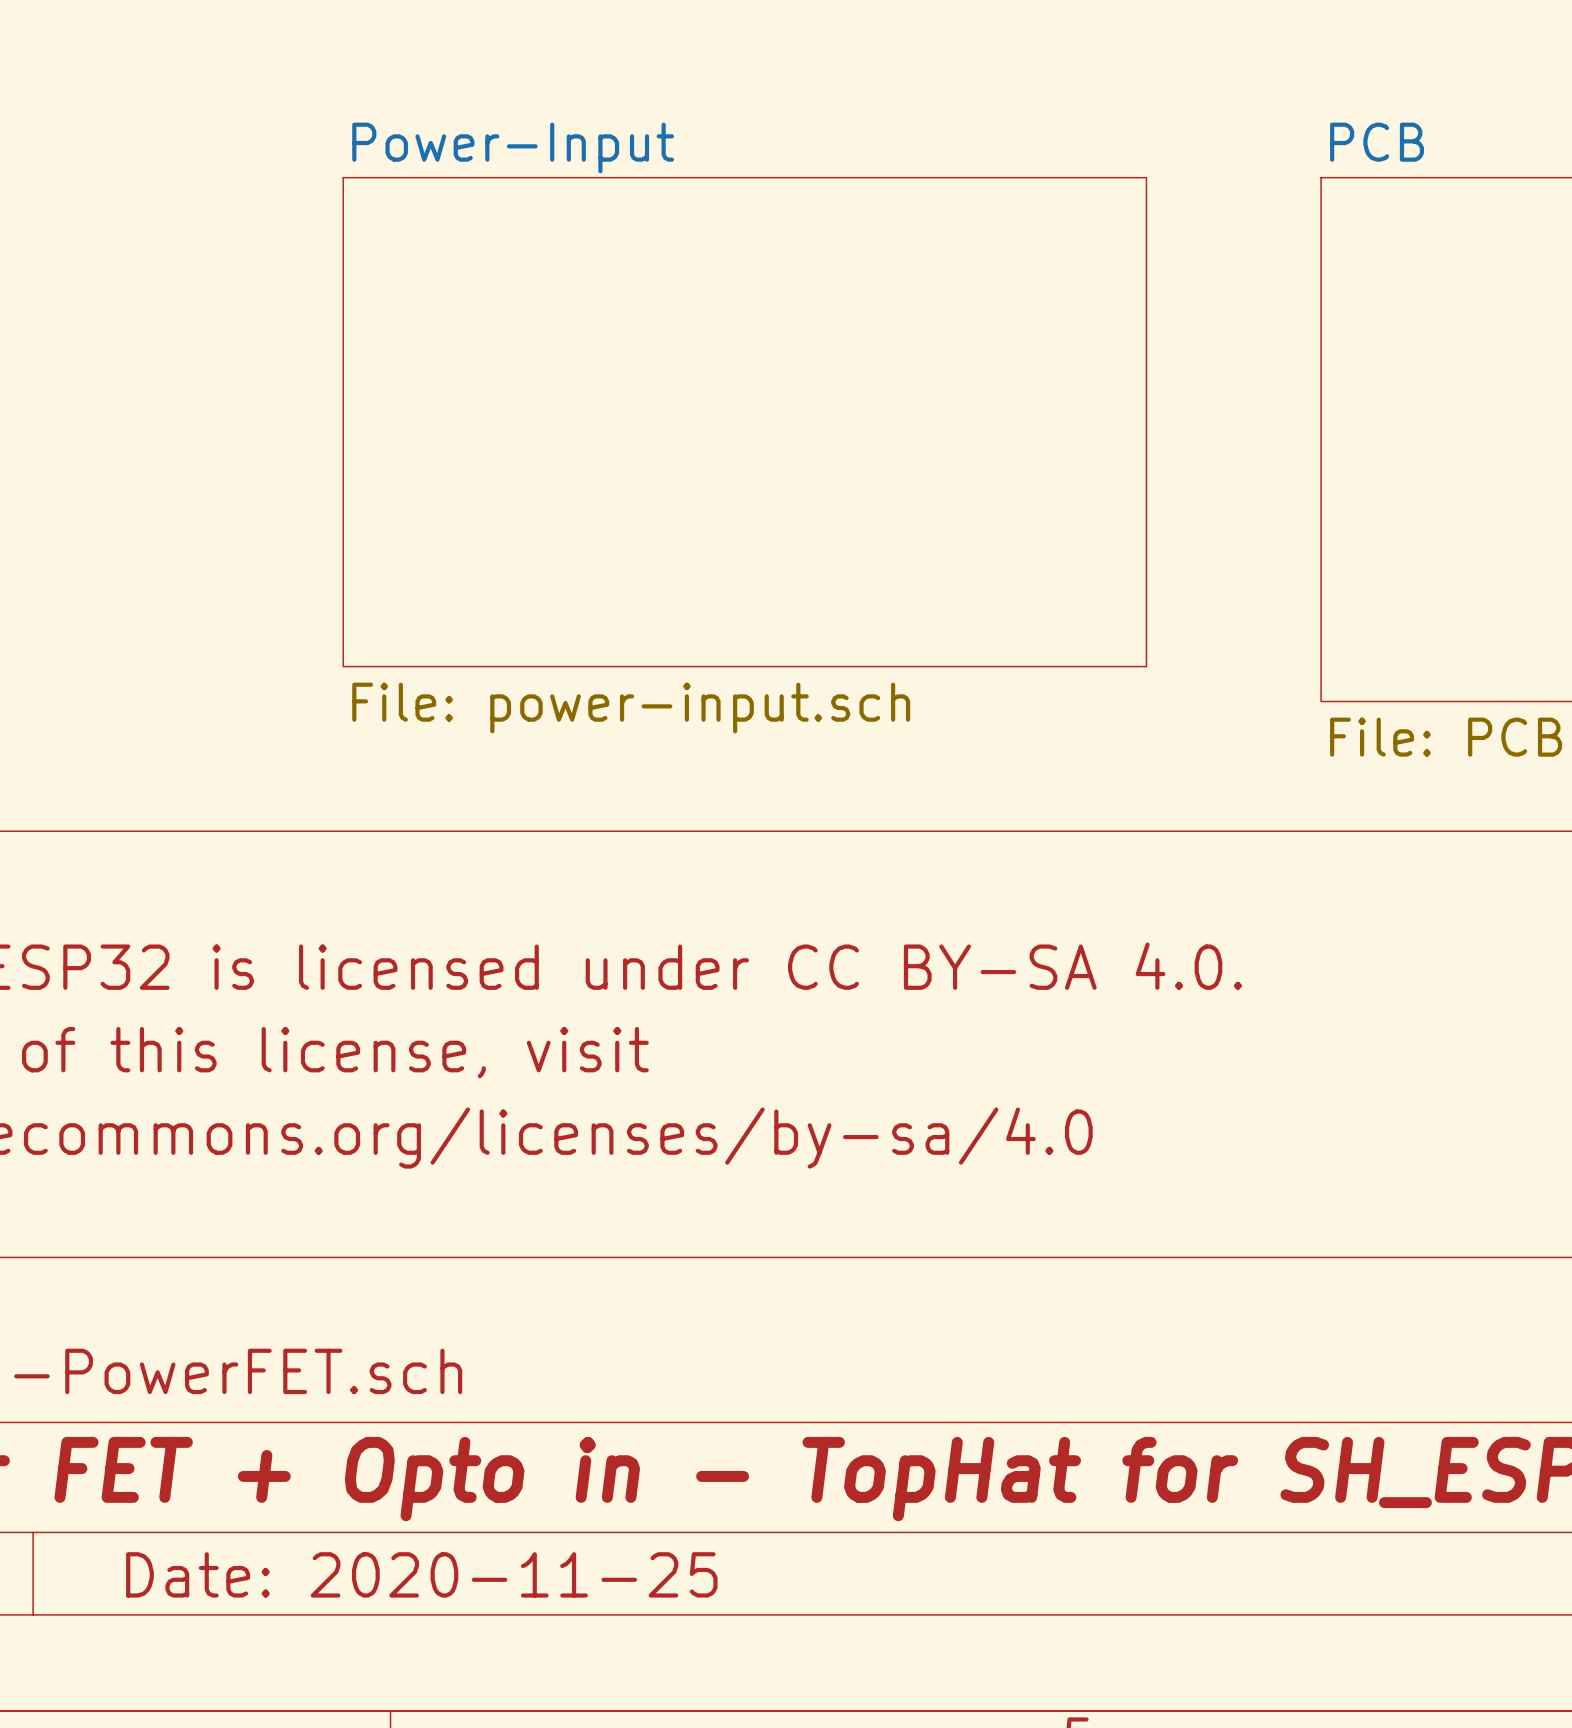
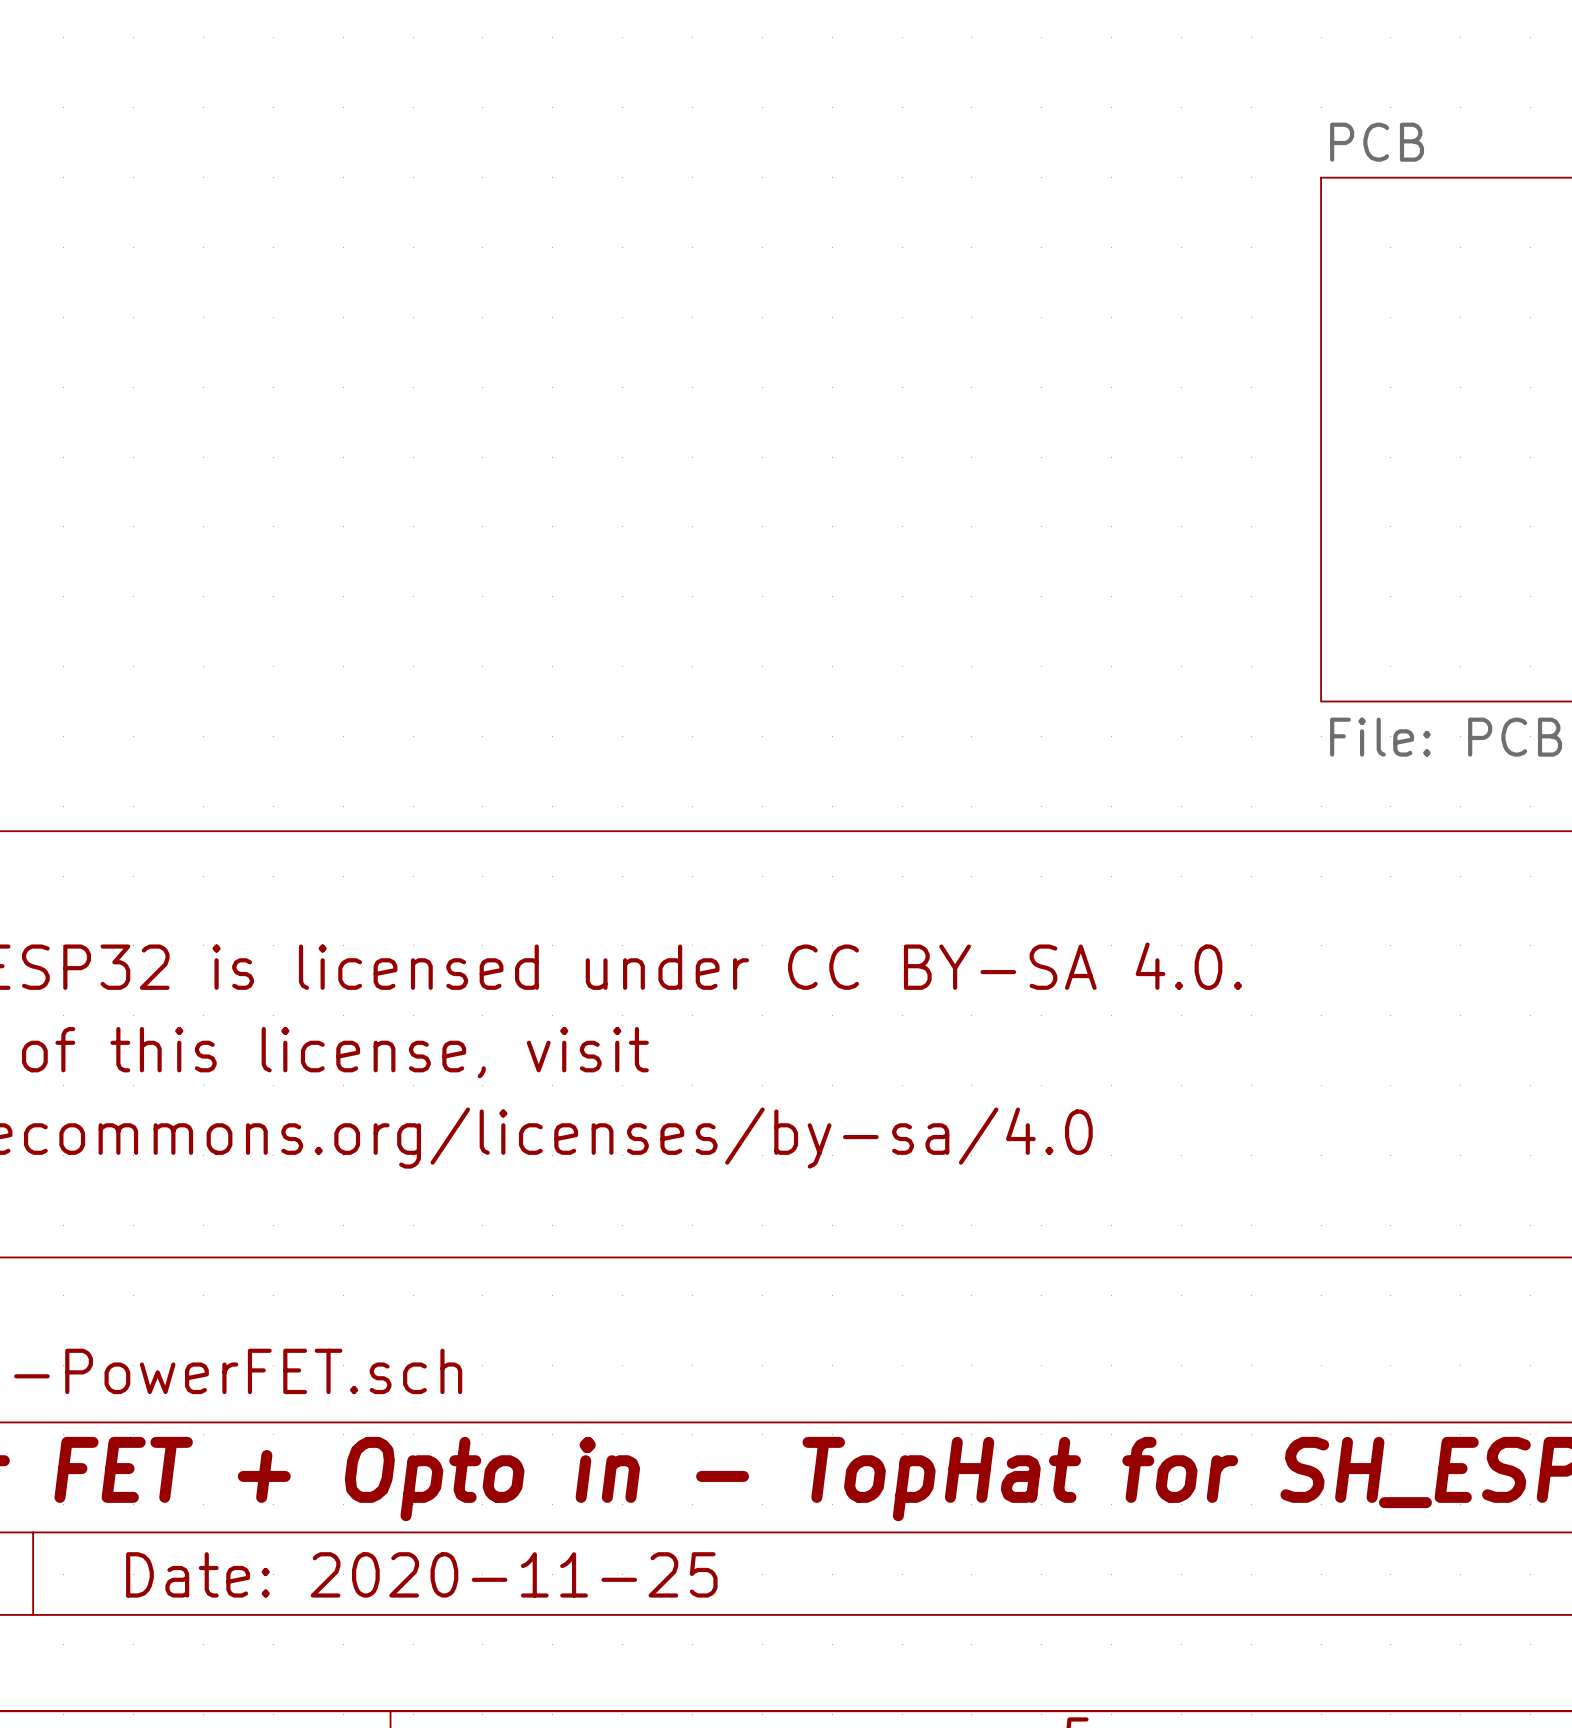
sheet Power-Input: File: power-input.sch (744, 422) -> none

